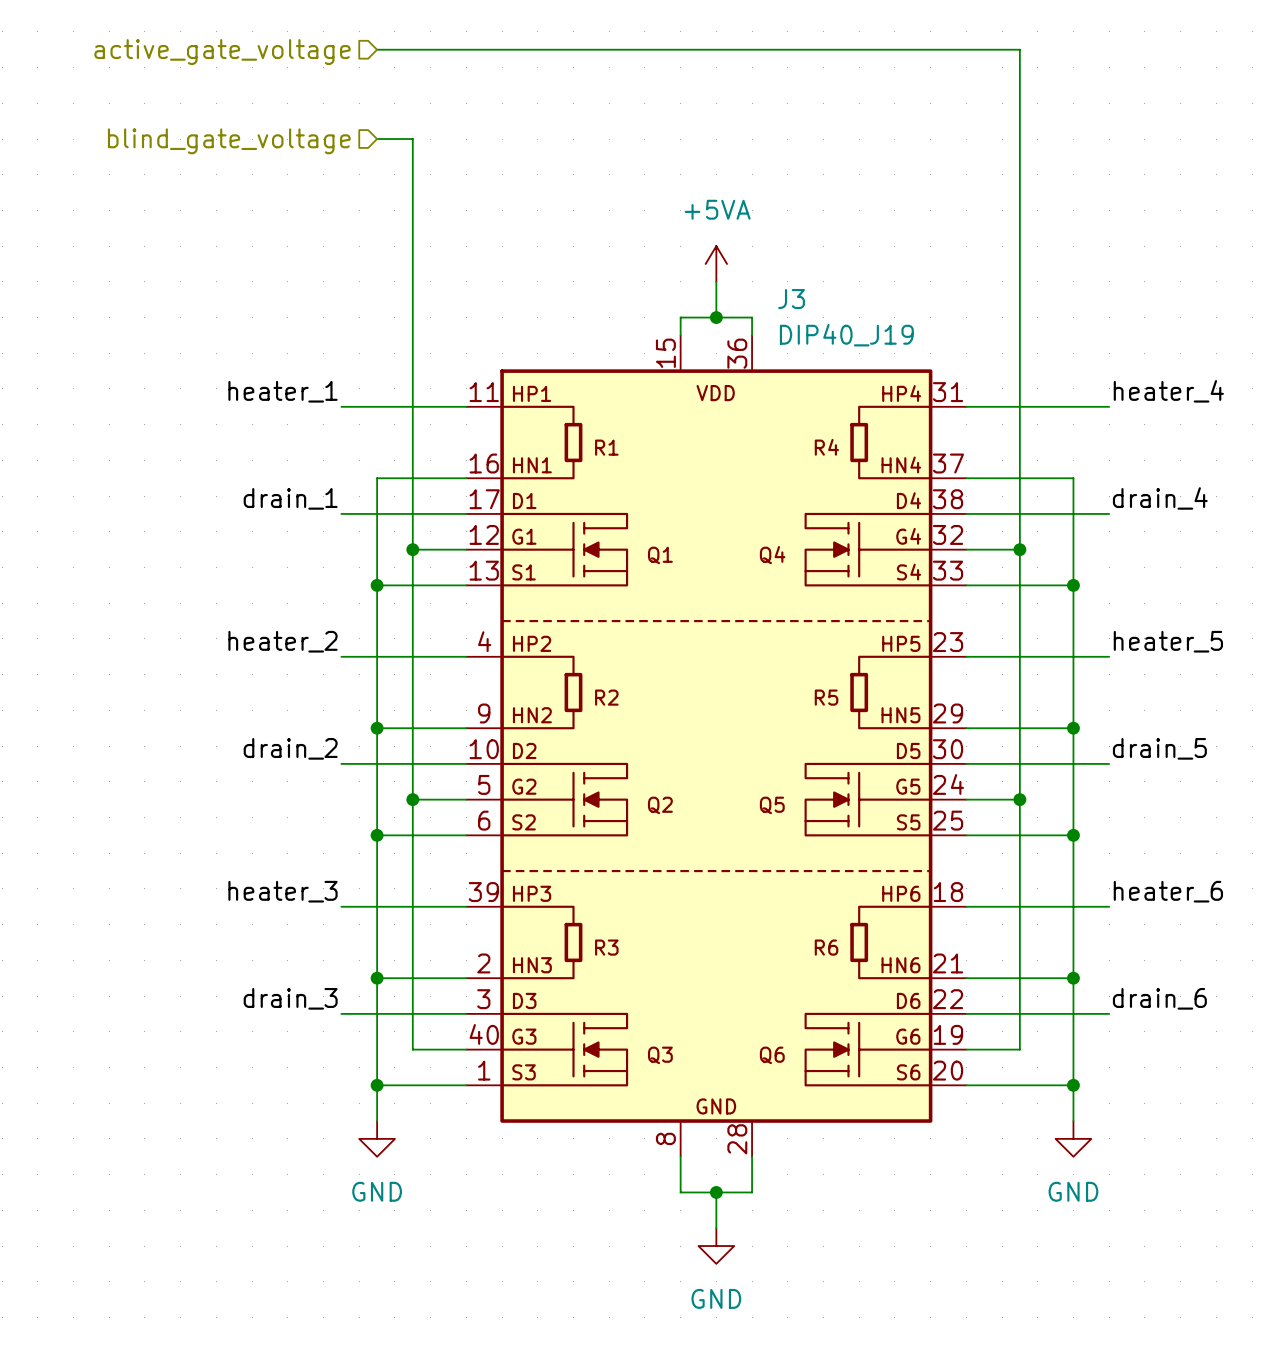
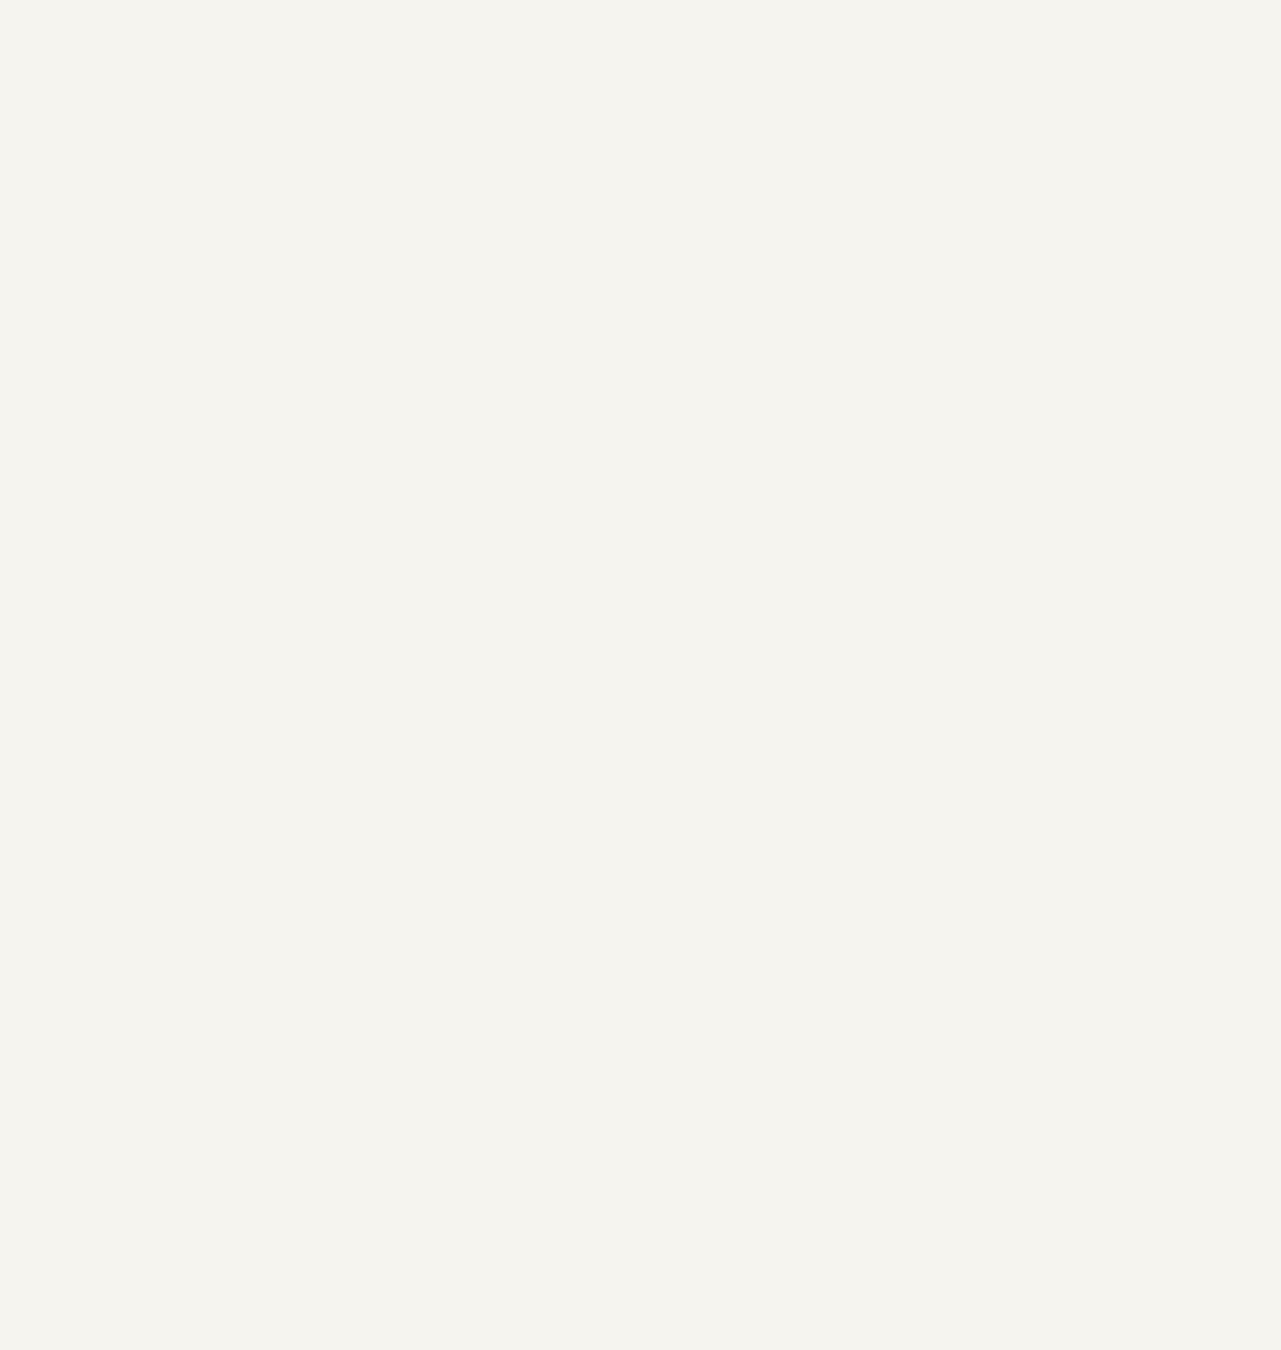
wire: (377, 49) (1019, 49) (1019, 1049) (966, 1049) -> none
hierarchical label: active_gate_voltage (222, 52) -> none
wire: (377, 139) (412, 139) (412, 1049) (466, 1049) -> none
hierarchical label: blind_gate_voltage (229, 141) -> none
power symbol: +5VA (716, 263) -> none
wire: (716, 281) (716, 317) -> none
junction: (716, 317) -> none
wire: (680, 335) (680, 317) (752, 317) (752, 335) -> none
label: heater_1 (283, 391) -> none
label: heater_4 (1168, 391) -> none
wire: (341, 406) (466, 406) -> none
wire: (966, 406) (1109, 406) -> none
wire: (466, 478) (377, 478) (377, 1121) -> none
wire: (966, 478) (1073, 478) (1073, 1121) -> none
label: drain_1 (290, 498) -> none
label: drain_4 (1160, 498) -> none
wire: (341, 513) (466, 513) -> none
wire: (966, 513) (1109, 513) -> none
wire: (412, 549) (466, 549) -> none
junction: (412, 549) -> none
wire: (966, 549) (1019, 549) -> none
junction: (1019, 549) -> none
wire: (377, 585) (466, 585) -> none
junction: (377, 585) -> none
wire: (966, 585) (1073, 585) -> none
junction: (1073, 585) -> none
label: heater_2 (283, 641) -> none
label: heater_5 (1168, 641) -> none
wire: (341, 656) (466, 656) -> none
wire: (966, 656) (1109, 656) -> none
wire: (377, 728) (466, 728) -> none
junction: (377, 728) -> none
wire: (966, 728) (1073, 728) -> none
junction: (1073, 728) -> none
J3: DIP40_J19 (716, 746) -> none
label: drain_2 (290, 748) -> none
label: drain_5 (1159, 748) -> none
wire: (341, 763) (466, 763) -> none
wire: (966, 763) (1109, 763) -> none
wire: (412, 799) (466, 799) -> none
junction: (412, 799) -> none
wire: (966, 799) (1019, 799) -> none
junction: (1019, 799) -> none
wire: (377, 835) (466, 835) -> none
junction: (377, 835) -> none
wire: (966, 835) (1073, 835) -> none
junction: (1073, 835) -> none
label: heater_3 (283, 891) -> none
label: heater_6 (1168, 891) -> none
wire: (341, 906) (466, 906) -> none
wire: (966, 906) (1109, 906) -> none
wire: (377, 978) (466, 978) -> none
junction: (377, 978) -> none
wire: (966, 978) (1073, 978) -> none
junction: (1073, 978) -> none
label: drain_3 (290, 998) -> none
label: drain_6 (1159, 998) -> none
wire: (341, 1013) (466, 1013) -> none
wire: (966, 1013) (1109, 1013) -> none
wire: (377, 1085) (466, 1085) -> none
junction: (377, 1085) -> none
wire: (966, 1085) (1073, 1085) -> none
junction: (1073, 1085) -> none
power symbol: GND (377, 1138) -> none
power symbol: GND (1073, 1138) -> none
wire: (680, 1156) (680, 1192) (752, 1192) (752, 1156) -> none
wire: (716, 1192) (716, 1228) -> none
junction: (716, 1192) -> none
power symbol: GND (716, 1246) -> none

